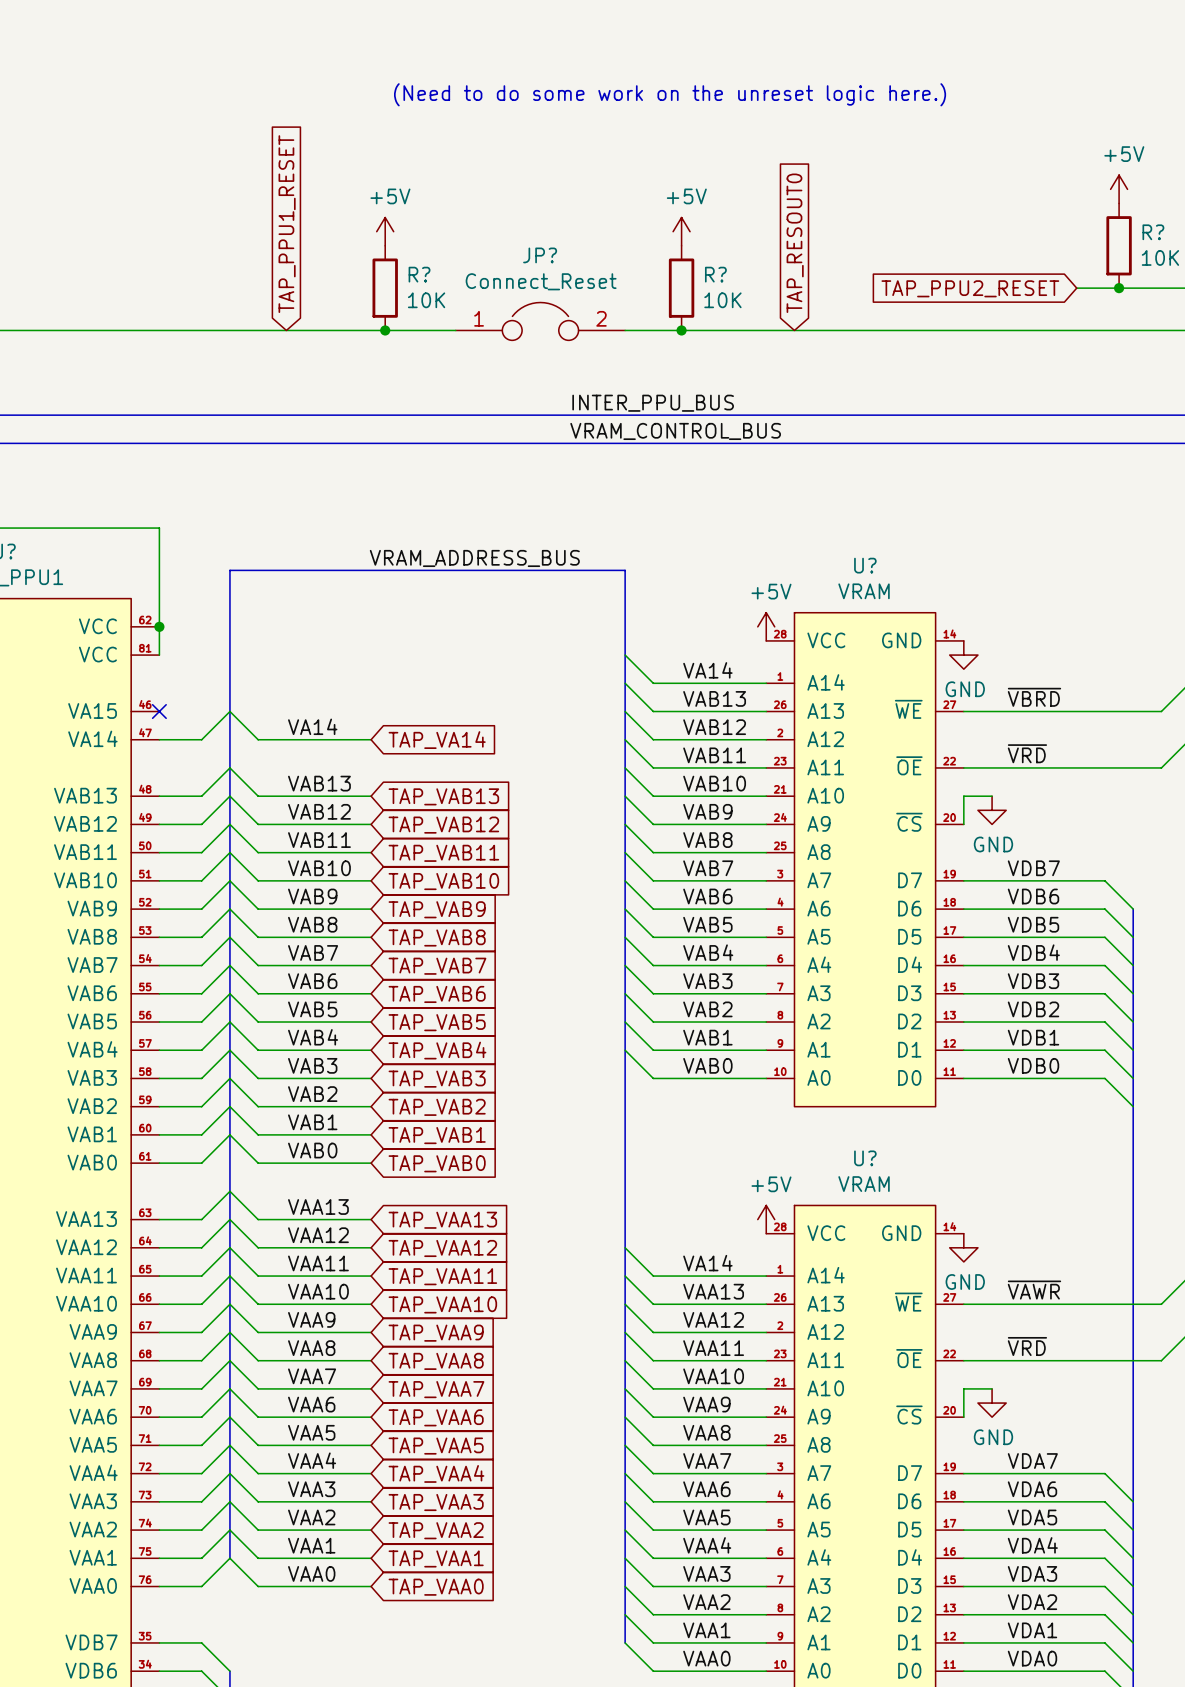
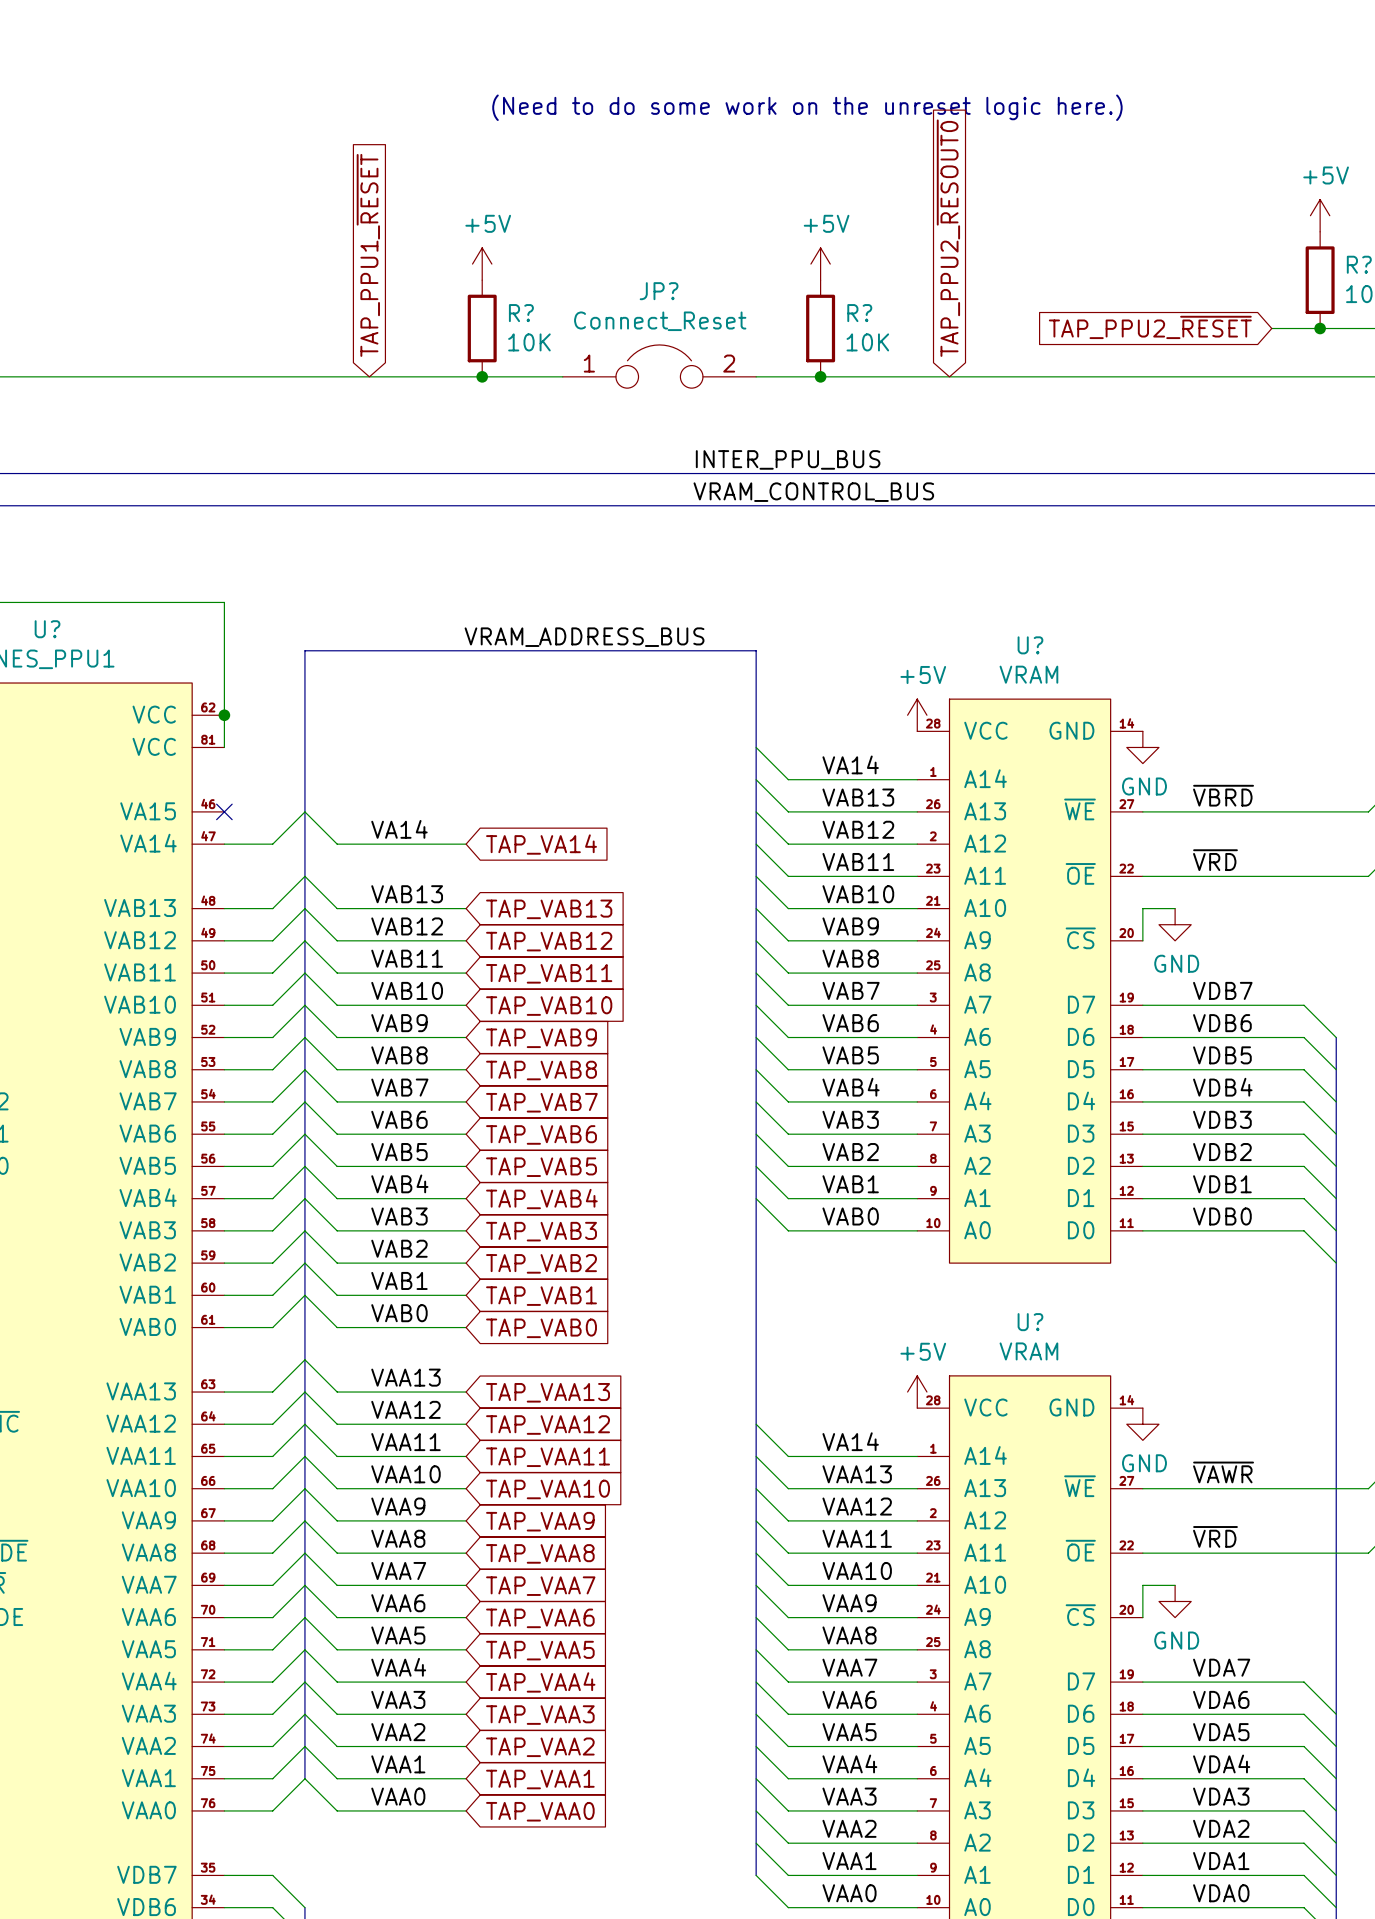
global label: TAP_PPU1_RESET (287, 224) -> TAP_PPU1_~{RESET} (368, 255)
global label: TAP_RESOUT0 (795, 243) -> TAP_PPU2_~{RESOUT0} (948, 238)
global label: TAP_PPU2_RESET (970, 288) -> TAP_PPU2_~{RESET} (1150, 327)

